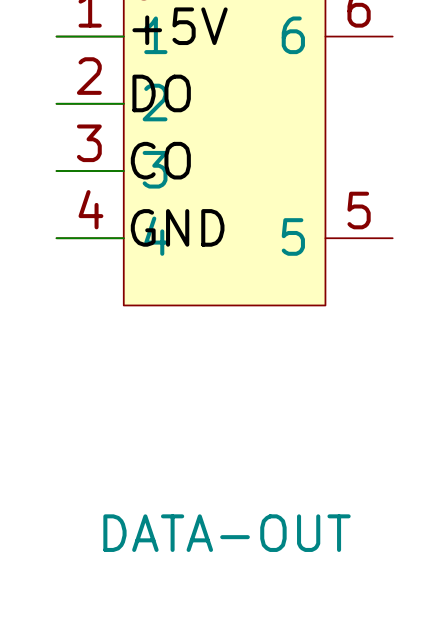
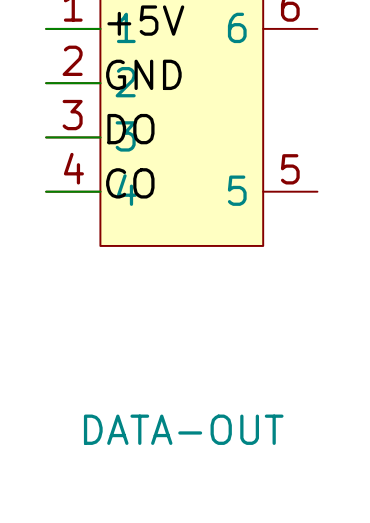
label: DO (161, 93) -> GND (143, 74)
label: CO (160, 160) -> DO (130, 129)
label: GND (177, 227) -> CO (130, 183)

